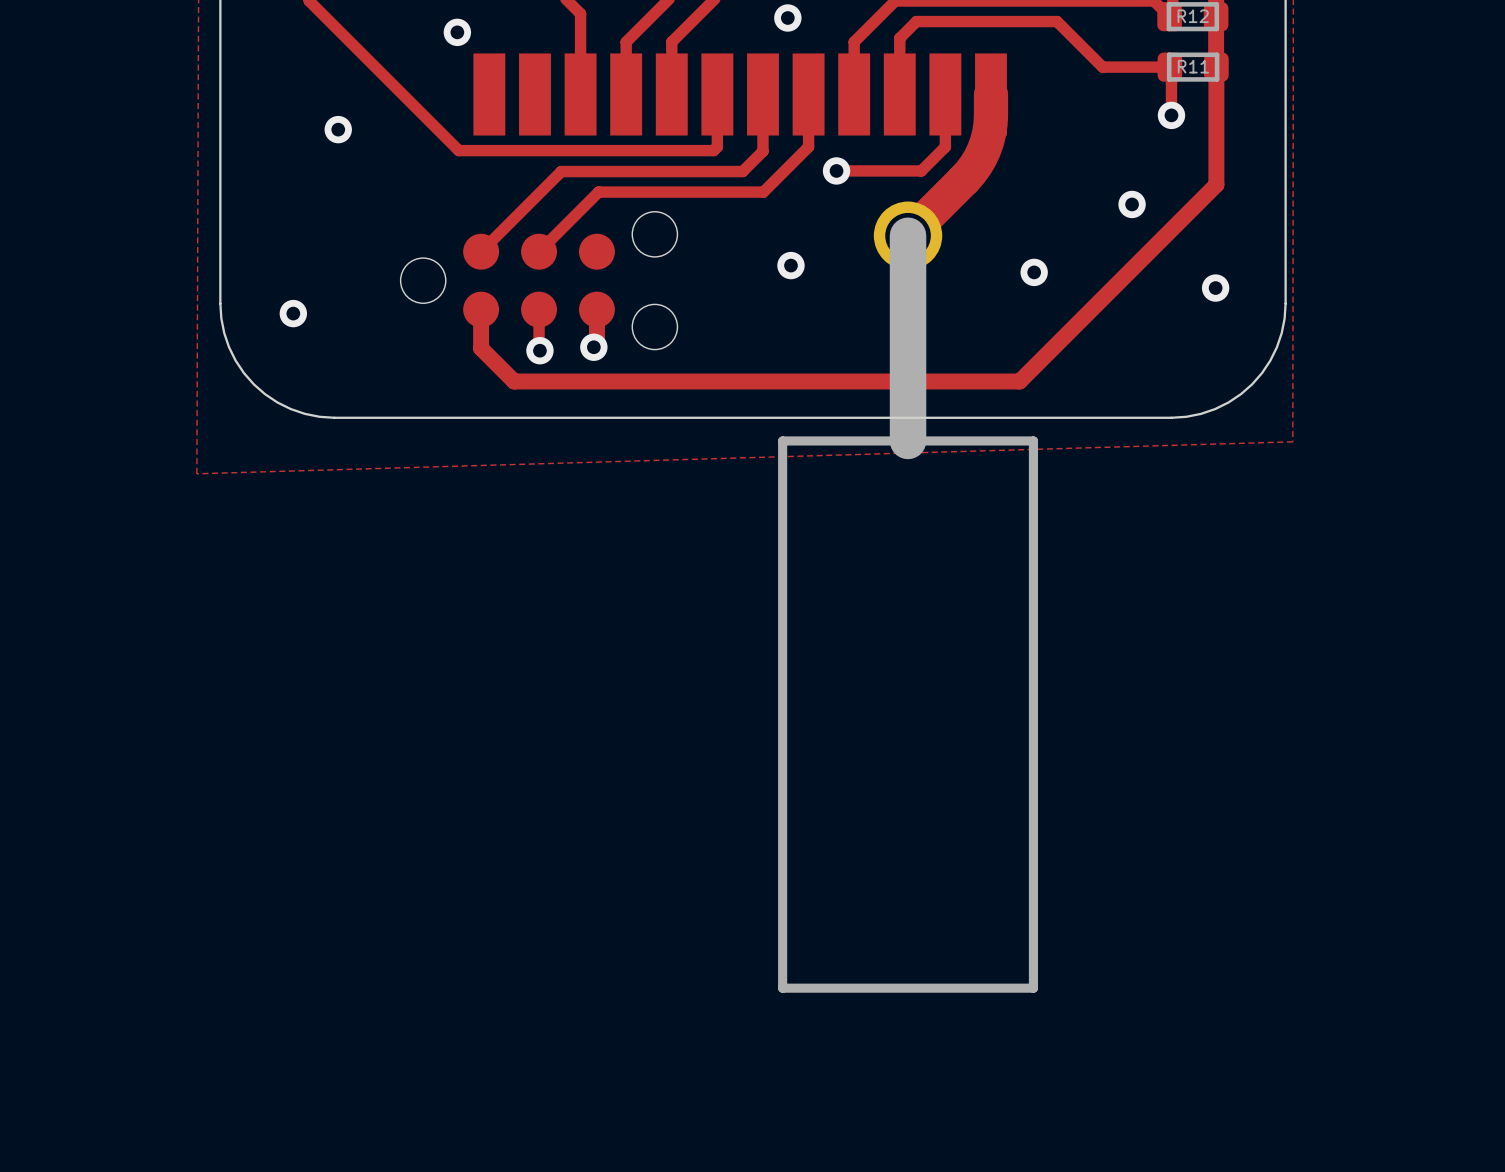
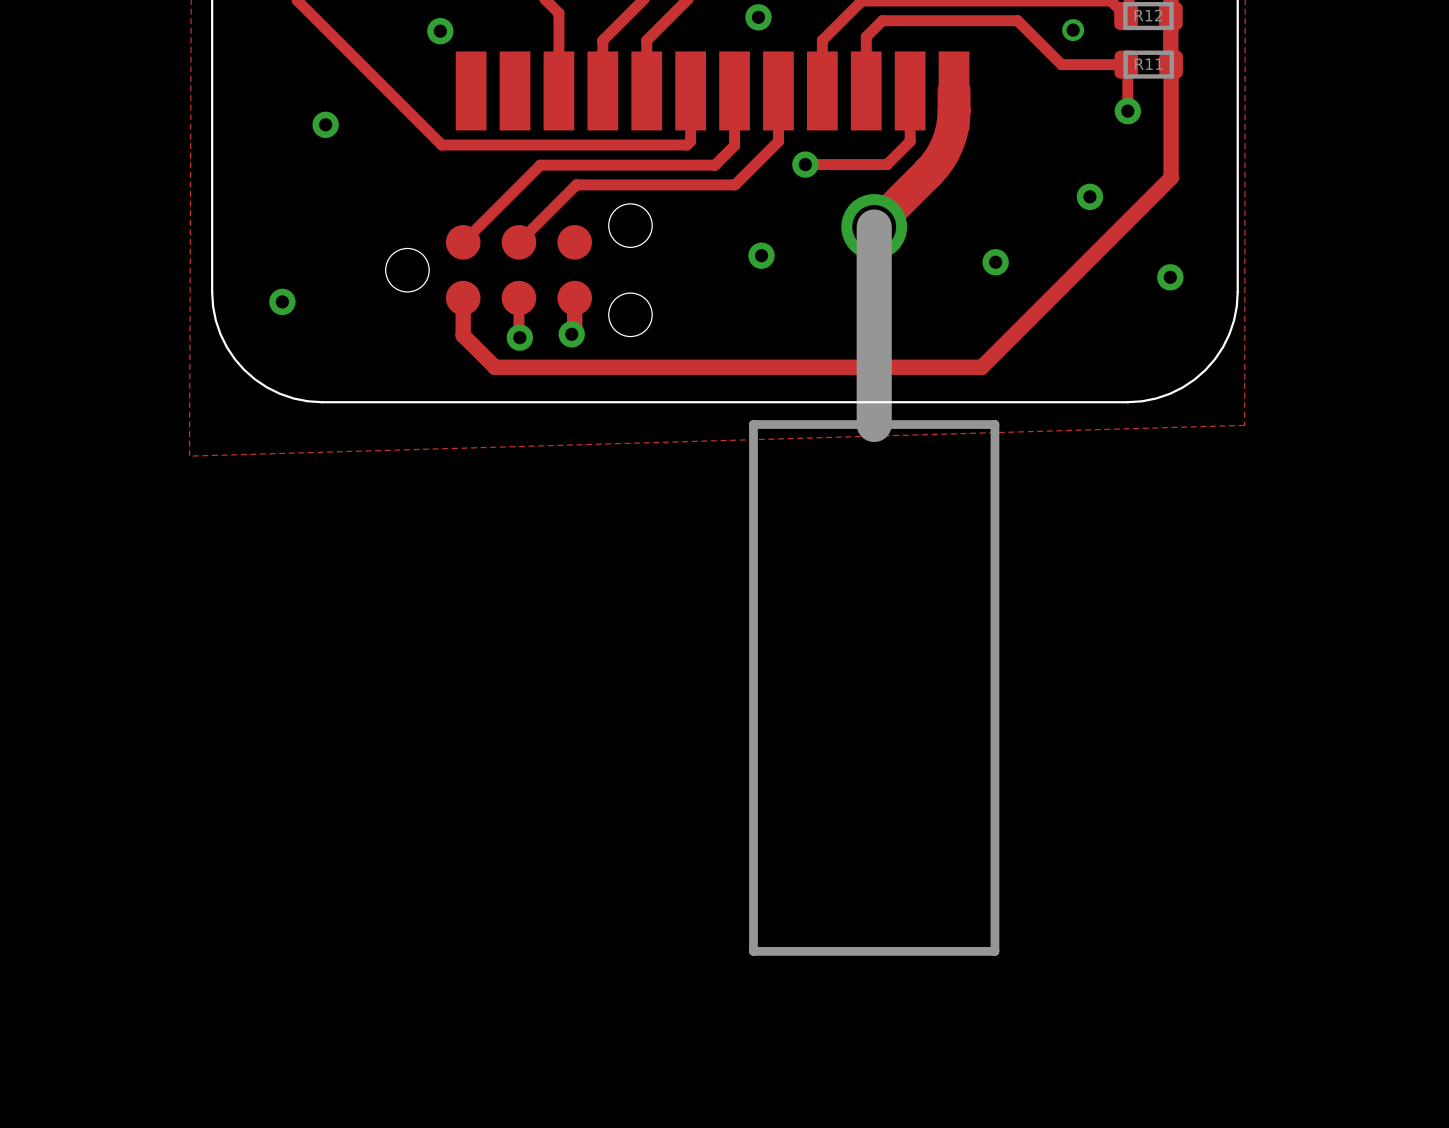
via: none -> (1073, 30)

